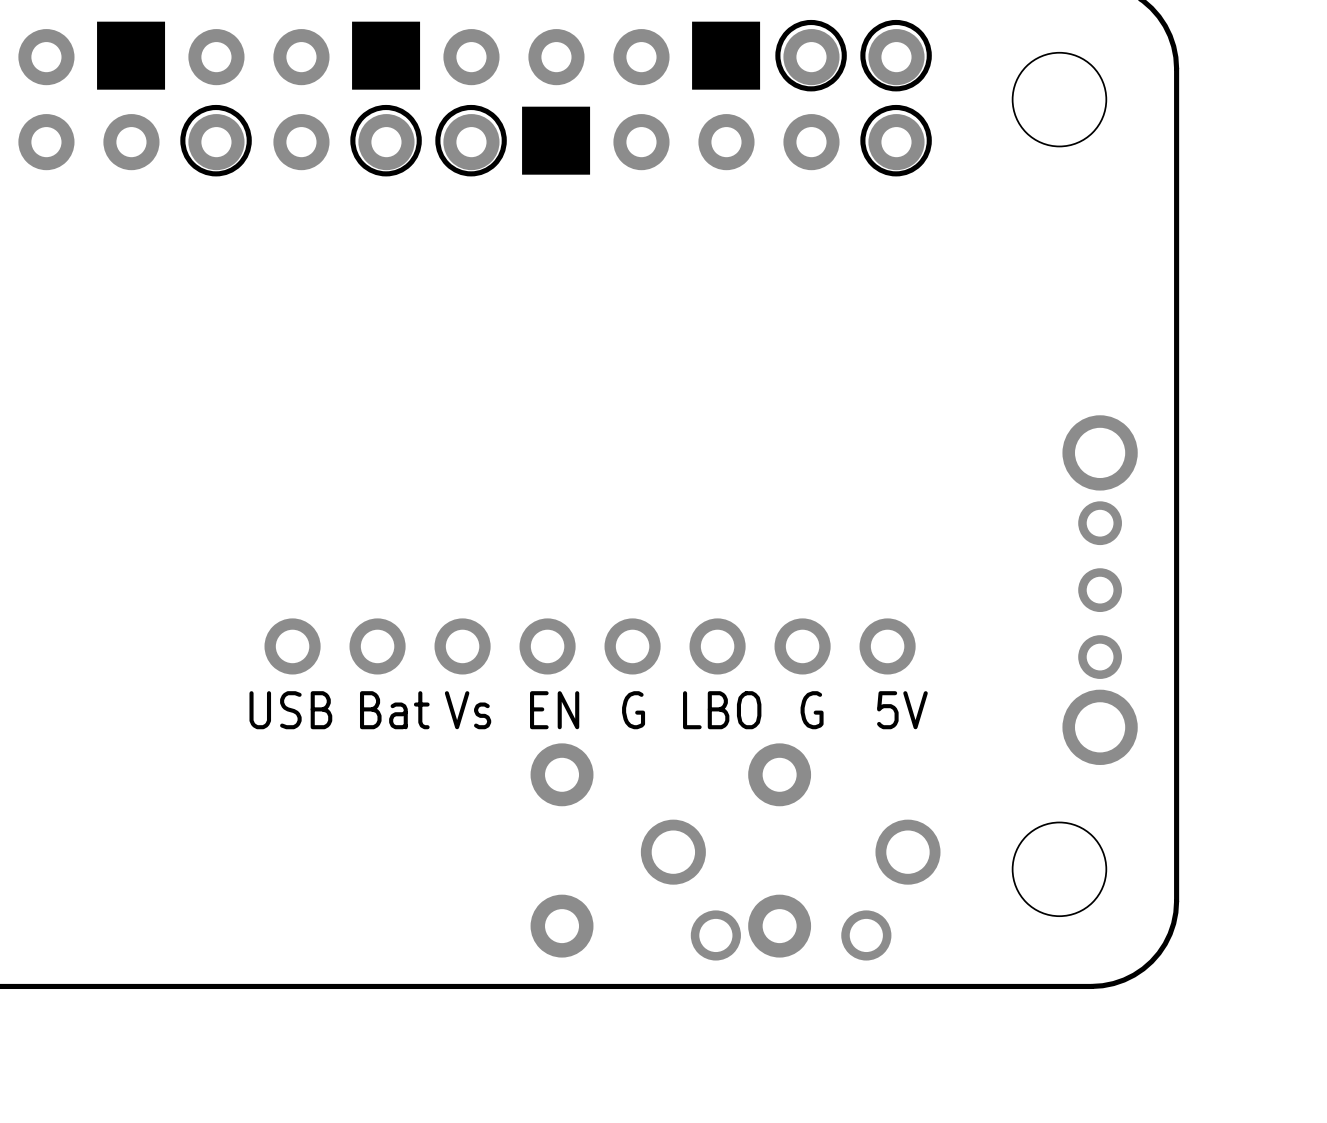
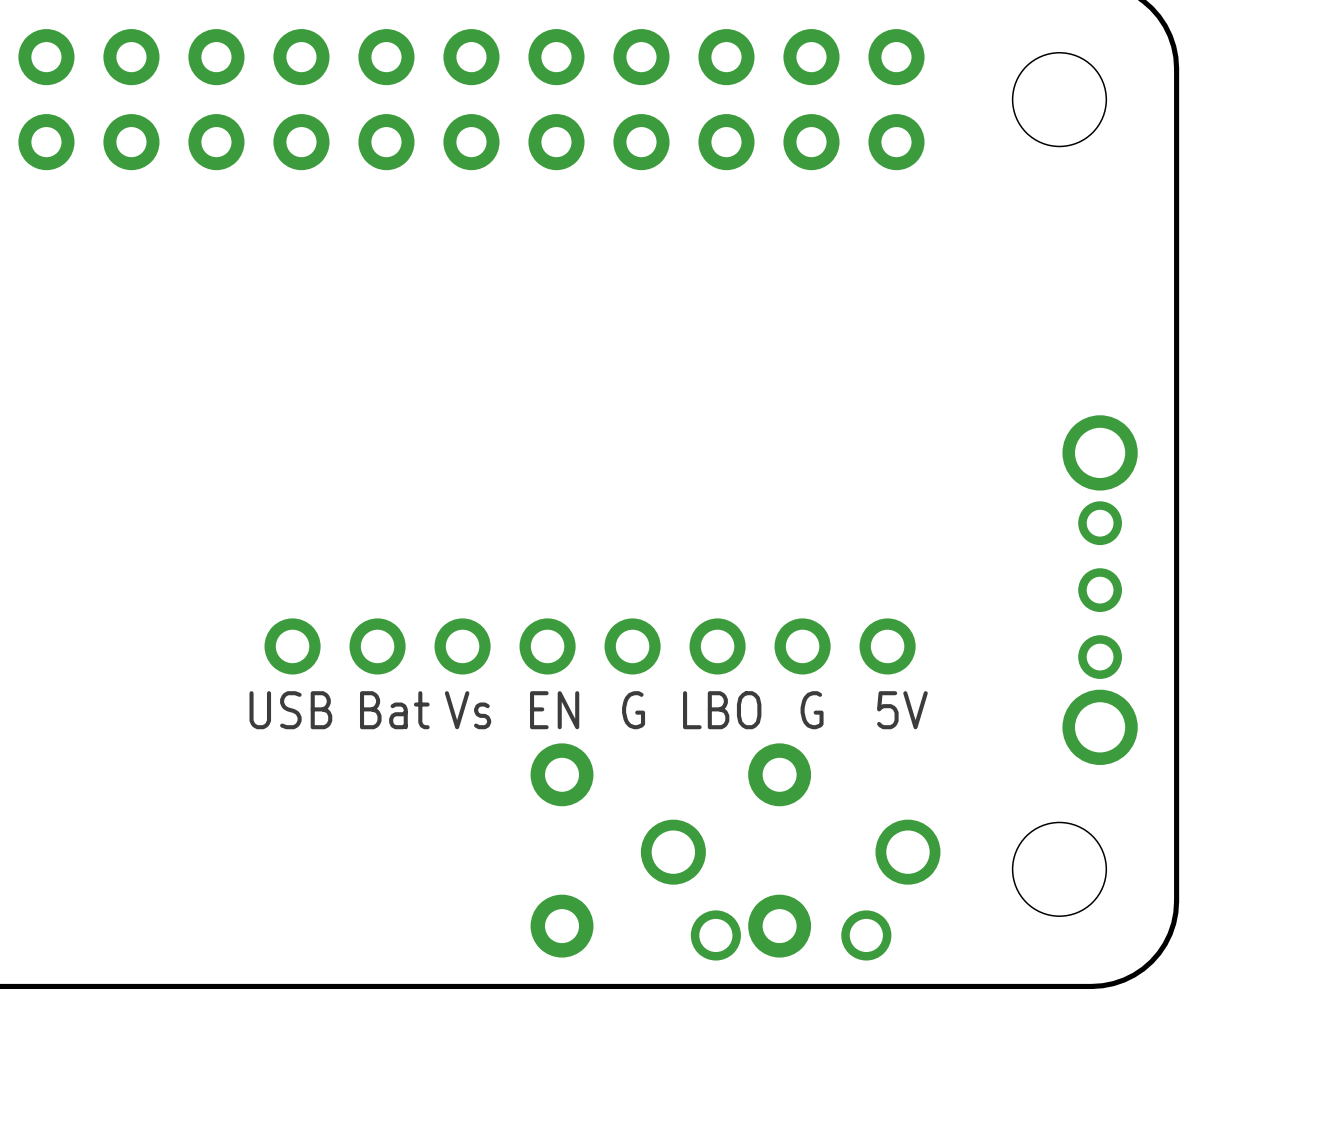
drawing: [692, 19, 932, 177] -> none
drawing: [97, 21, 252, 177] -> none
drawing: [350, 21, 591, 177] -> none

